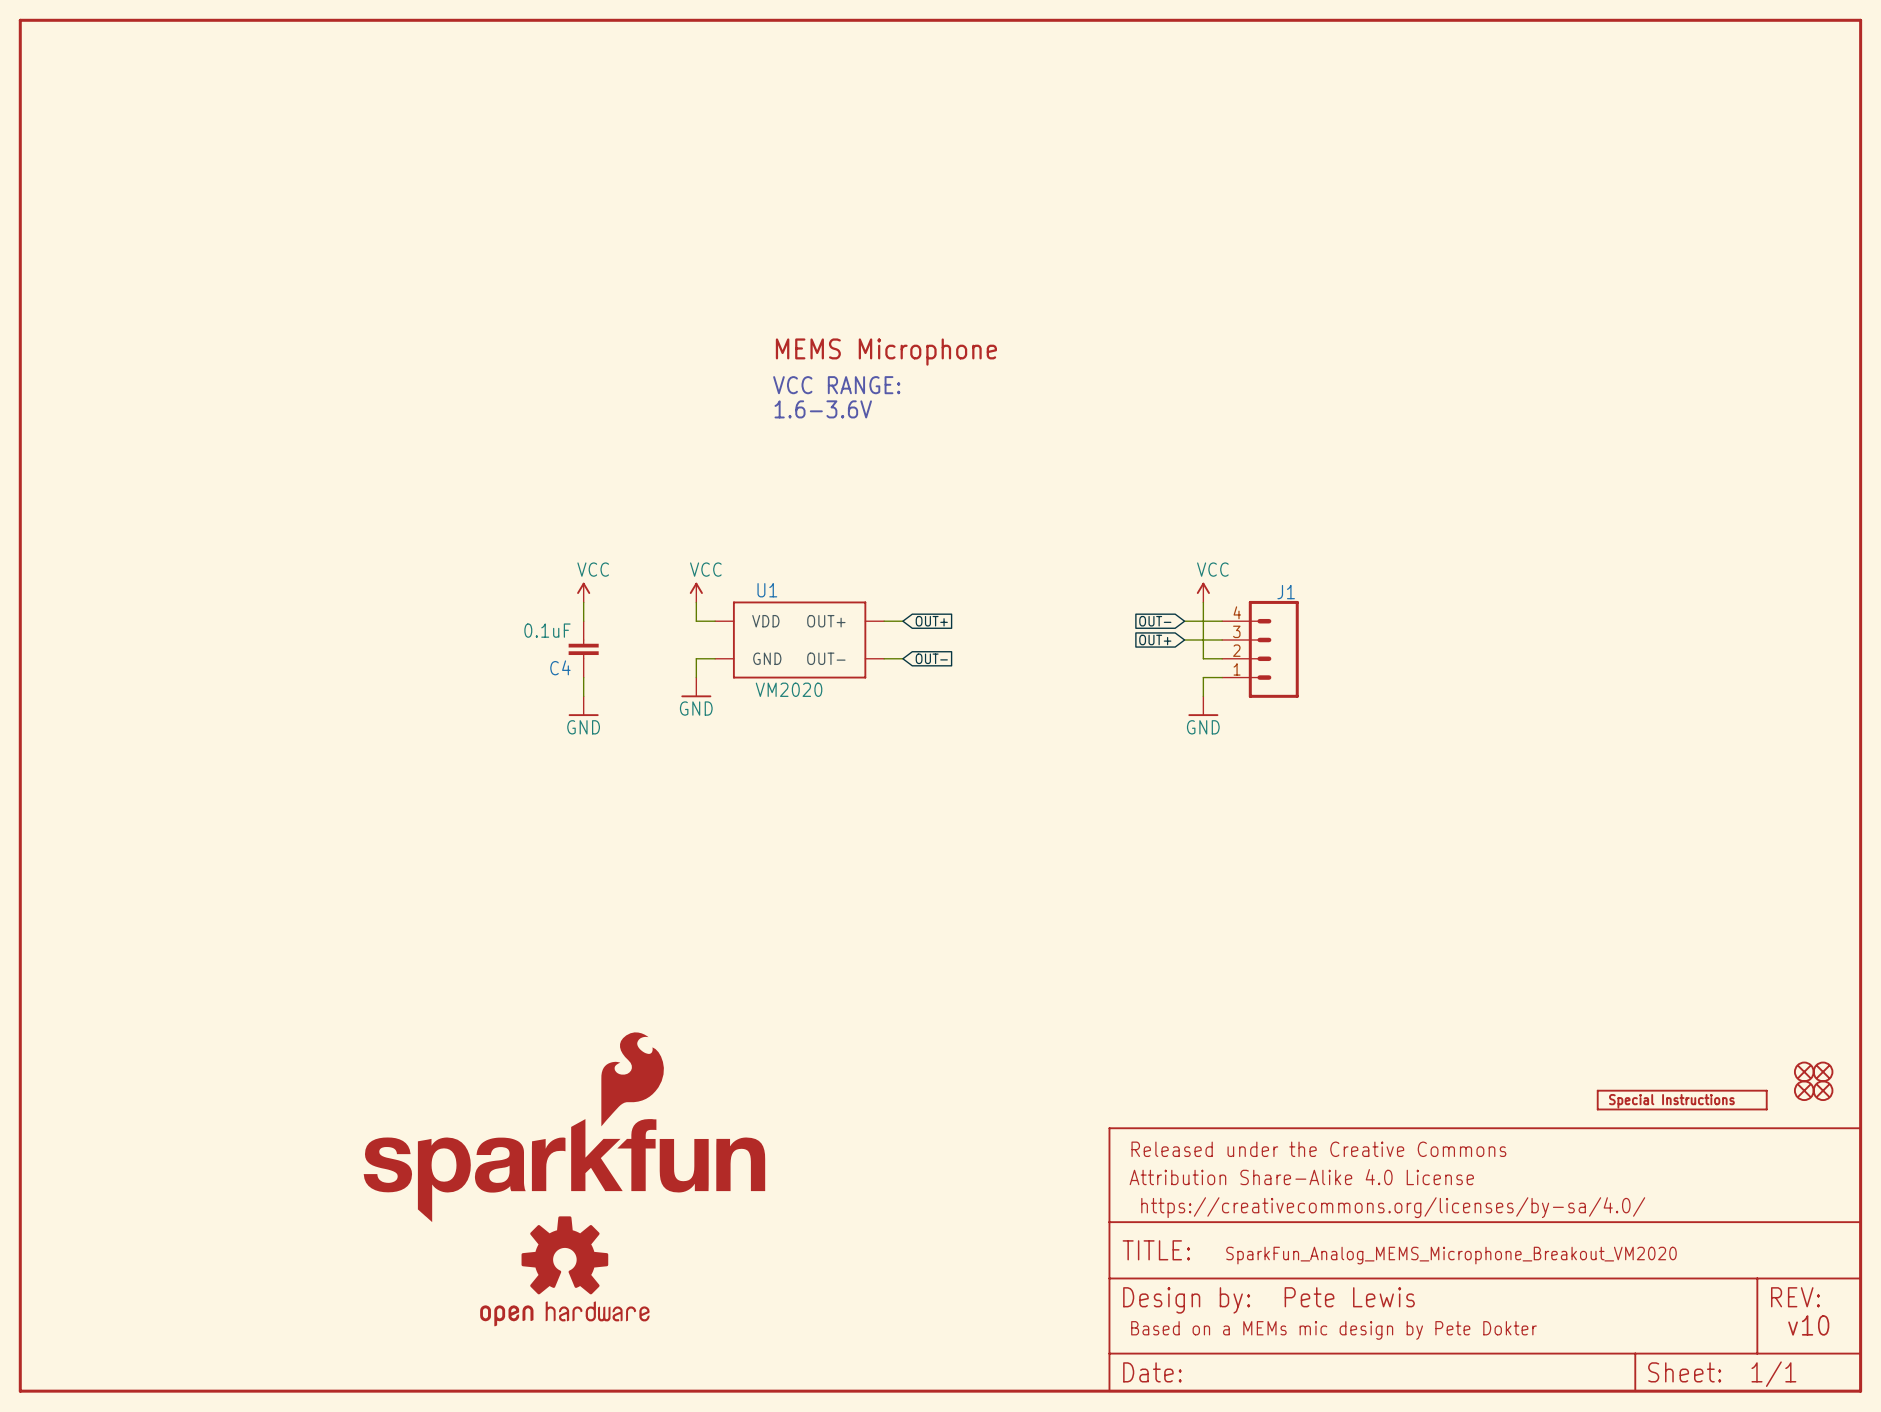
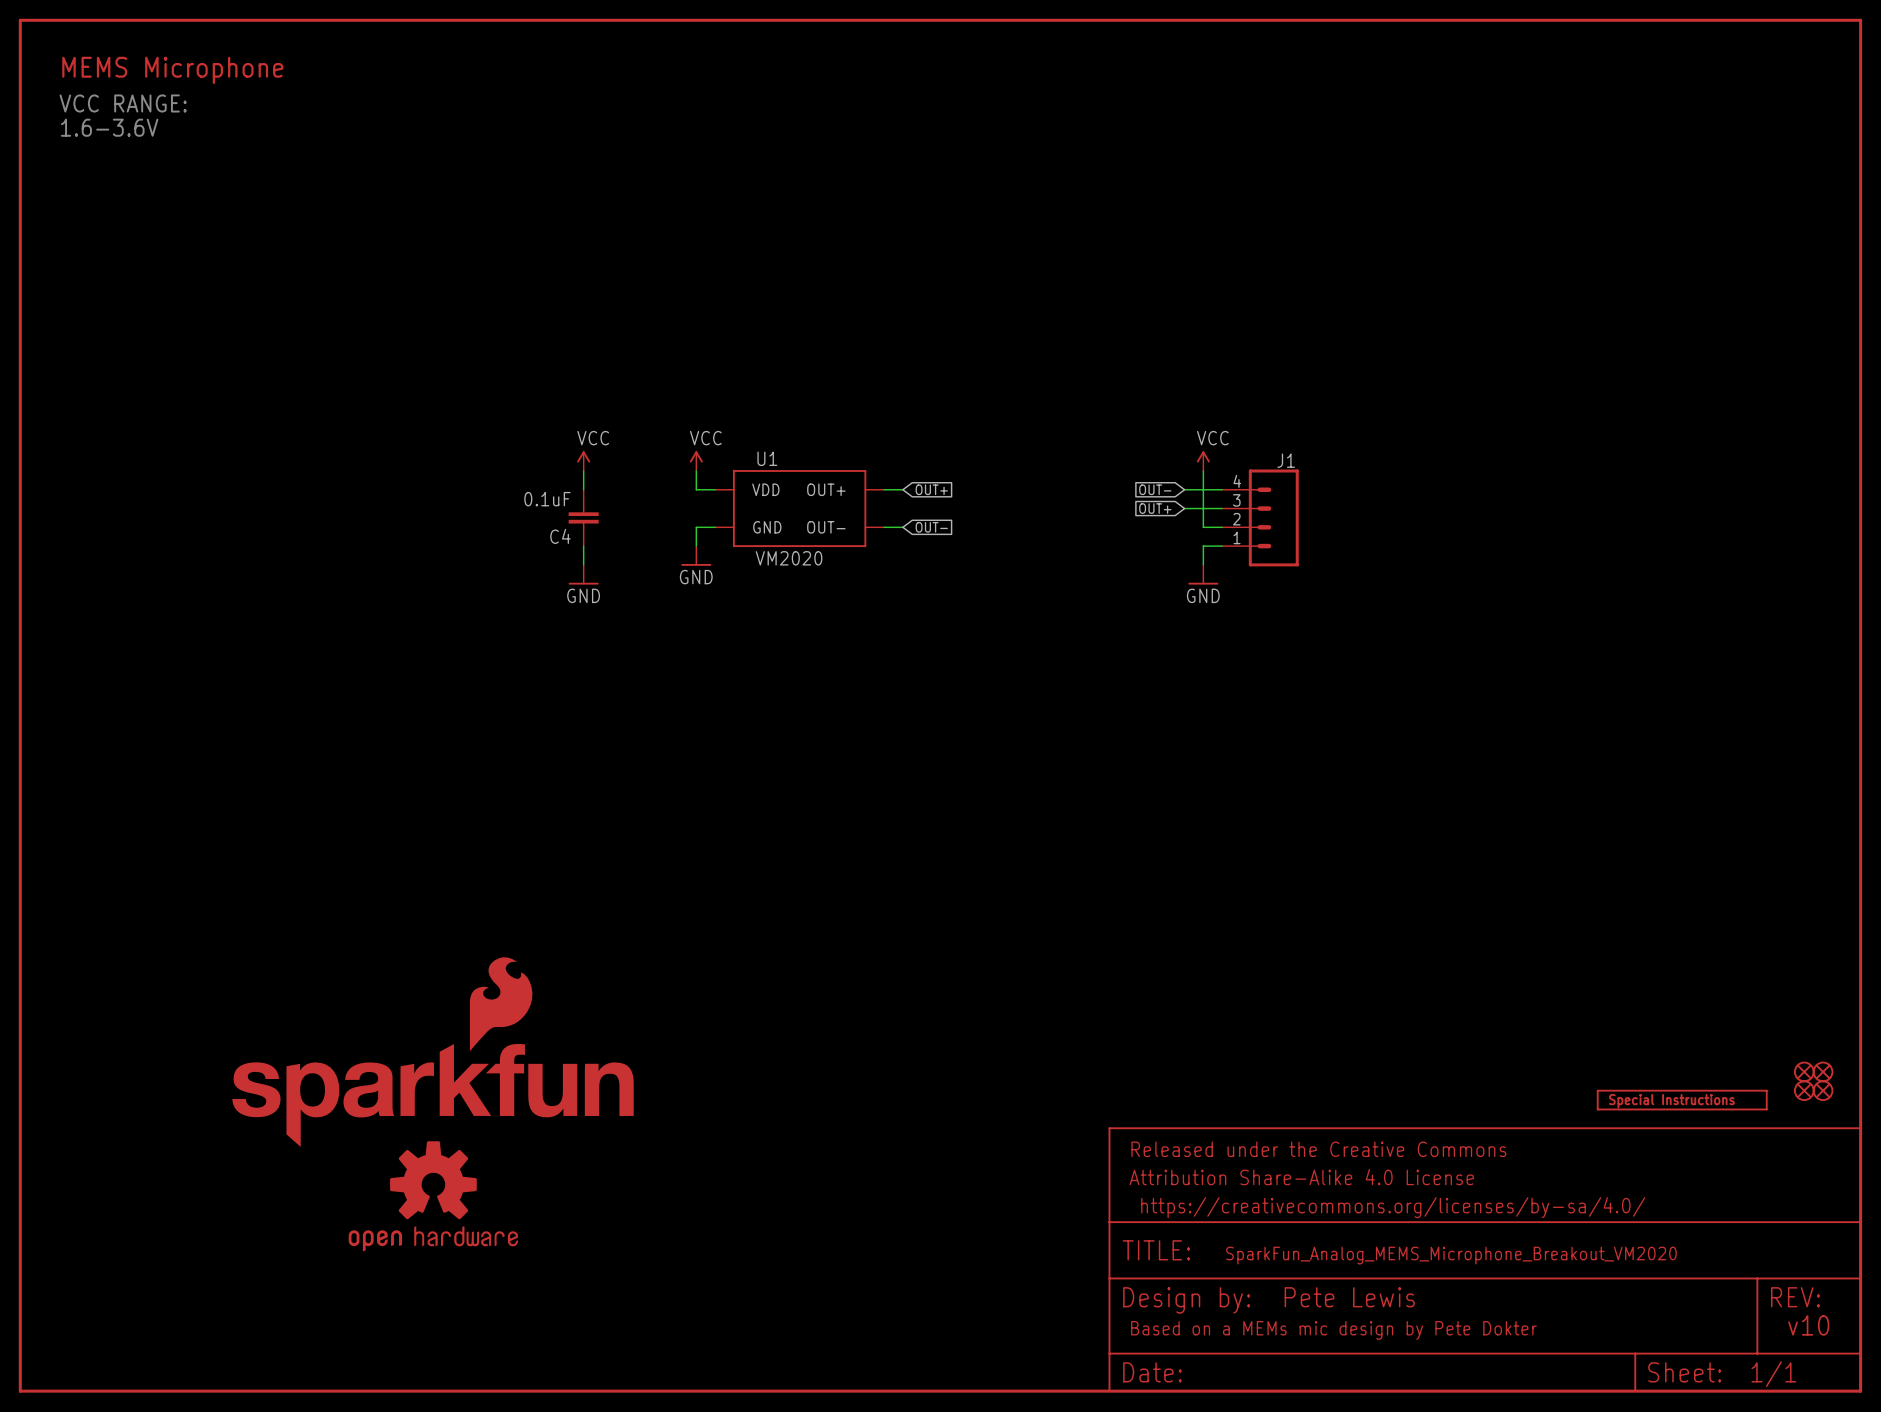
text: none -> MEMS Microphone (172, 70)
text: none -> VCC RANGE: (123, 103)
text: none -> 1.6-3.6V (109, 127)
text: MEMS Microphone (886, 352) -> none
text: VCC RANGE: (836, 385) -> none
text: 1.6-3.6V (823, 409) -> none
power symbol: none -> VCC (583, 461)
power symbol: none -> VCC (696, 461)
power symbol: none -> GND (696, 555)
power symbol: none -> GND (583, 574)
power symbol: VCC (583, 592) -> none
power symbol: VCC (696, 592) -> none
power symbol position: VCC (1203, 592) -> VCC (1203, 461)
wire: (583, 602) (583, 621) -> (583, 470) (583, 489)
wire: (696, 602) (696, 621) (715, 621) -> (696, 470) (696, 489) (715, 489)
wire: (1203, 602) (1203, 658) (1222, 658) -> (1203, 470) (1203, 527) (1222, 527)
wire: (884, 621) (902, 621) -> (884, 489) (902, 489)
global label position: OUT+ (931, 621) -> OUT+ (931, 489)
global label position: OUT- (1155, 621) -> OUT- (1155, 489)
wire: (1184, 621) (1222, 621) -> (1184, 489) (1222, 489)
U1 position: (799, 640) -> (799, 508)
global label position: OUT+ (1155, 640) -> OUT+ (1155, 508)
wire: (1184, 640) (1222, 640) -> (1184, 508) (1222, 508)
C4 position: (583, 649) -> (583, 517)
J1 position: (1260, 649) -> (1260, 517)
wire: (715, 658) (696, 658) (696, 677) -> (715, 527) (696, 527) (696, 546)
wire: (884, 658) (902, 658) -> (884, 527) (902, 527)
global label position: OUT- (931, 658) -> OUT- (931, 527)
wire: (583, 677) (583, 696) -> (583, 546) (583, 564)
wire: (1222, 677) (1203, 677) (1203, 696) -> (1222, 546) (1203, 546) (1203, 564)
power symbol: GND (696, 687) -> none
power symbol: GND (583, 706) -> none
power symbol position: GND (1203, 706) -> GND (1203, 574)
part position: (632, 1079) -> (501, 1004)
drawing position: (596, 1155) -> (465, 1079)
drawing position: (636, 1155) -> (505, 1079)
drawing position: (387, 1164) -> (256, 1089)
drawing position: (498, 1164) -> (366, 1089)
drawing position: (548, 1164) -> (417, 1089)
drawing position: (740, 1164) -> (609, 1089)
drawing position: (500, 1165) -> (368, 1089)
drawing position: (684, 1165) -> (552, 1090)
drawing position: (462, 1172) -> (331, 1097)
drawing position: (444, 1179) -> (312, 1104)
part position: (564, 1271) -> (433, 1196)

